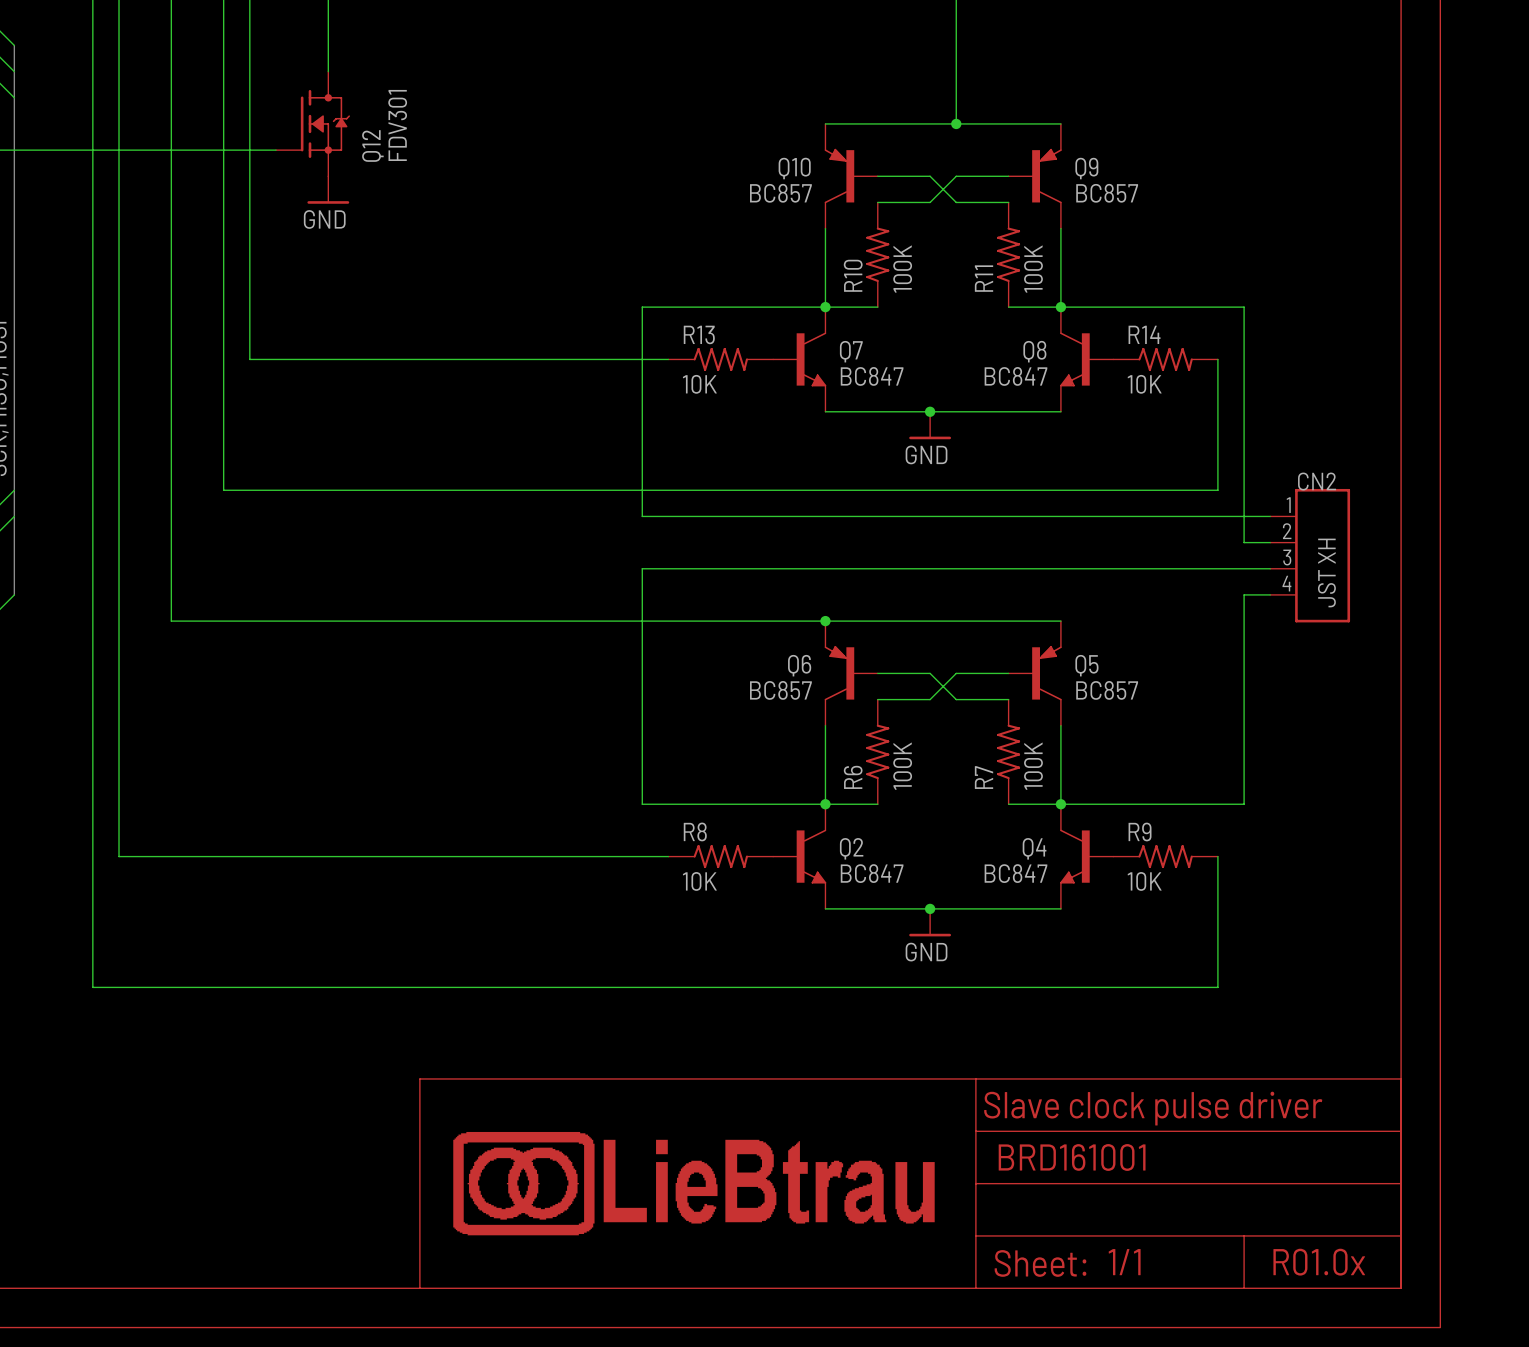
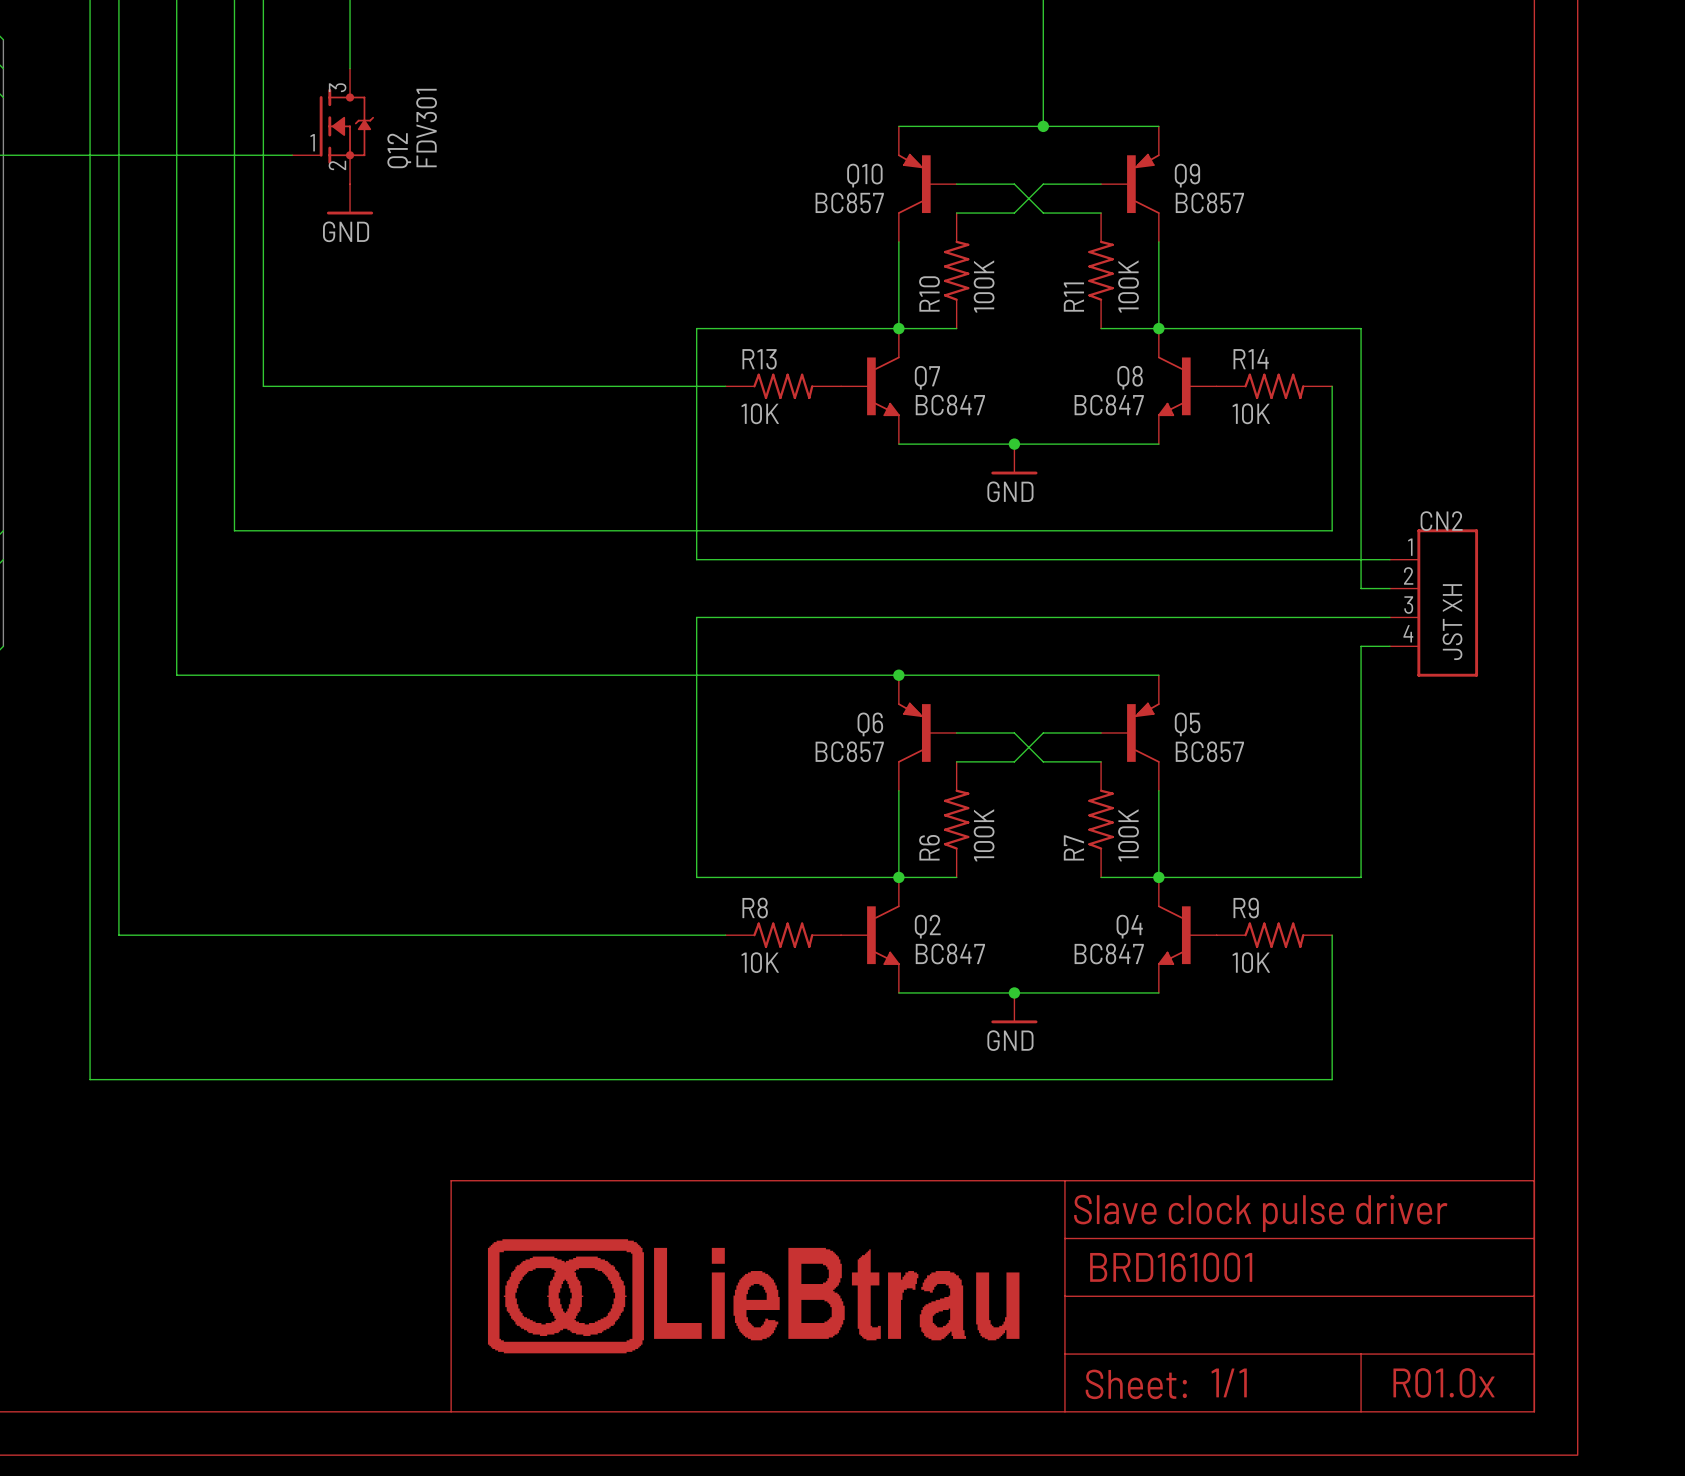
Q12 pin number: none -> 3 (337, 87)
Q12 pin number: none -> 1 (312, 142)
Q12 pin number: none -> 2 (337, 165)

